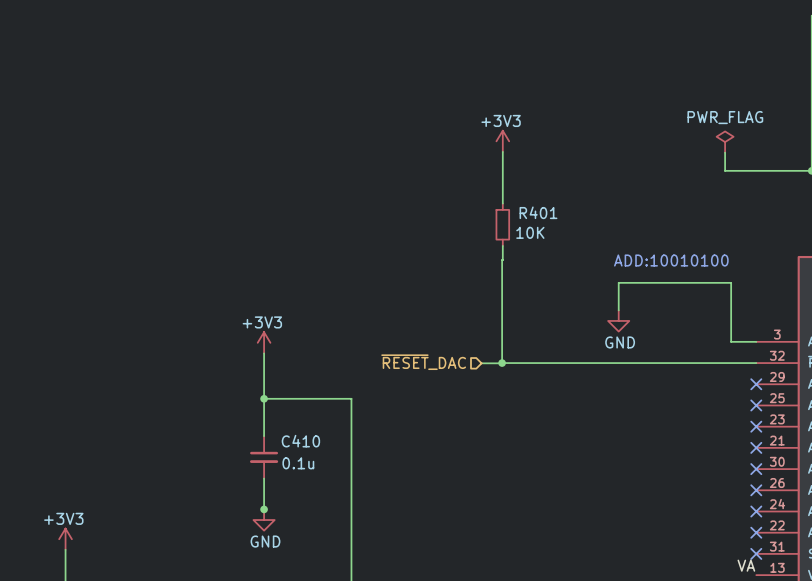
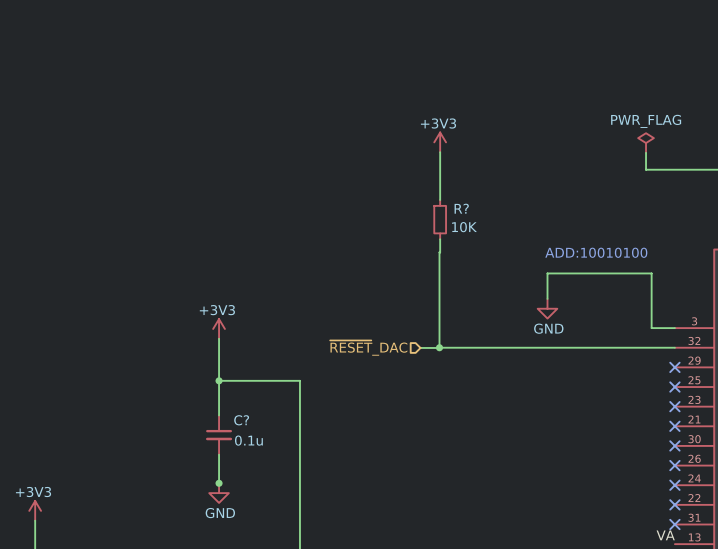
R401 name: R401 (538, 212) -> R? (461, 208)
C410 name: C410 (300, 441) -> C? (241, 420)

